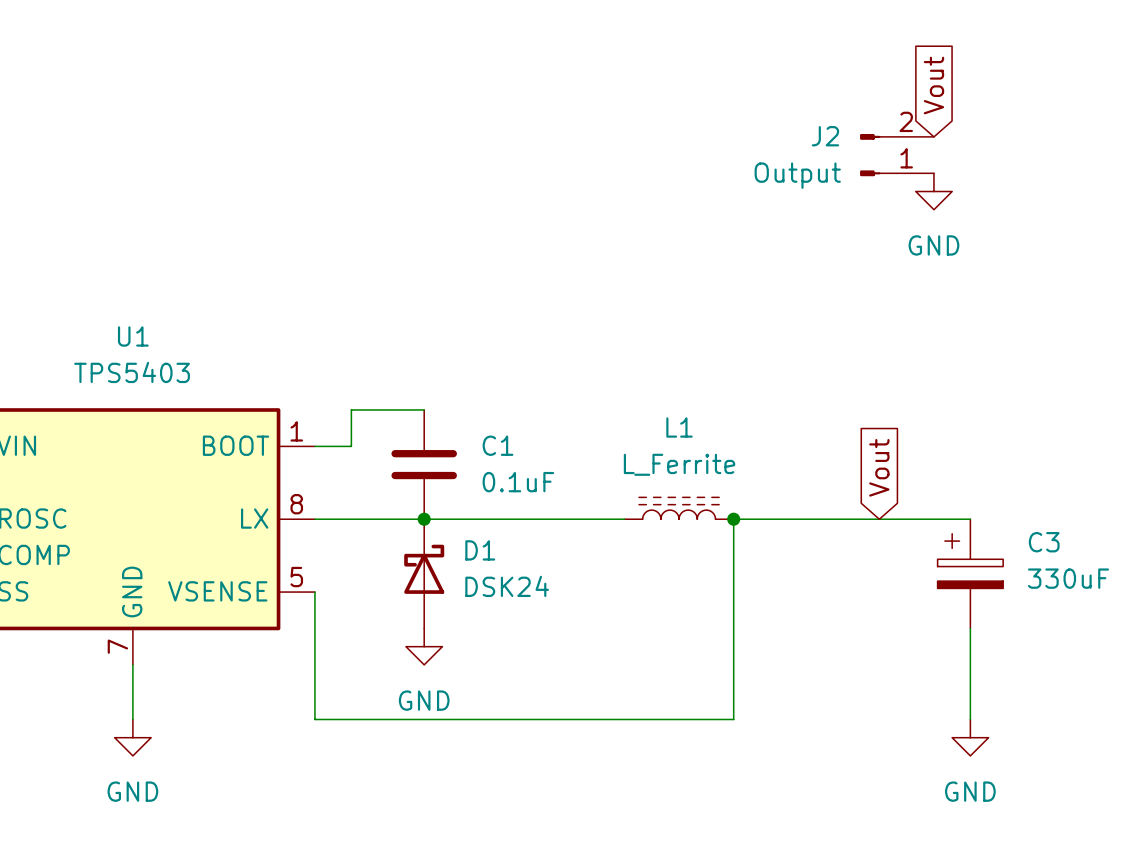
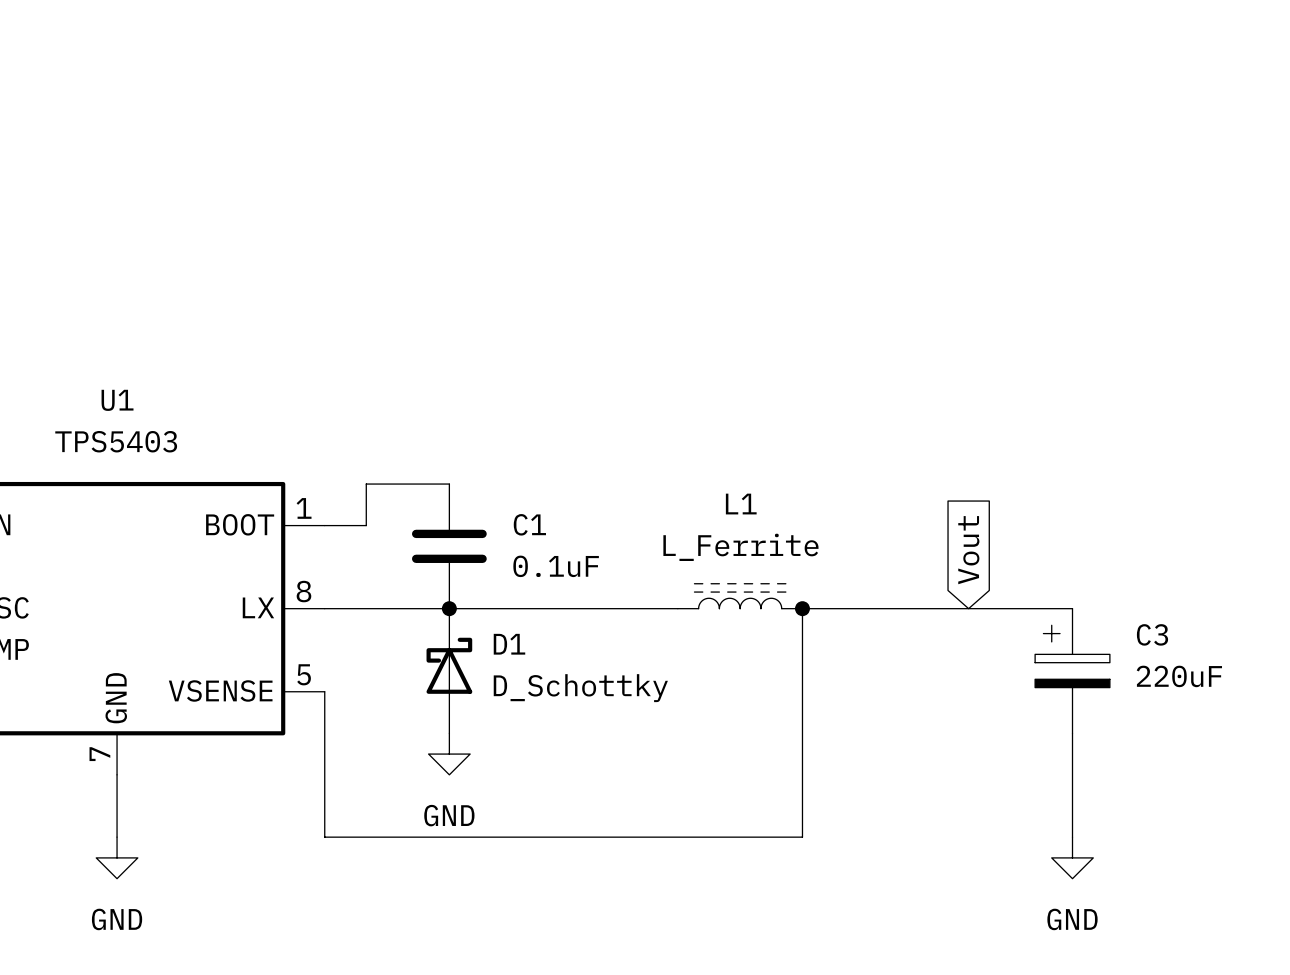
global label: Vout (933, 85) -> none
J2: Output (897, 155) -> none
power symbol: GND (933, 191) -> none
C3 value: 330uF (1068, 578) -> 220uF (1179, 676)
D1 value: DSK24 (507, 586) -> D_Schottky (580, 688)

